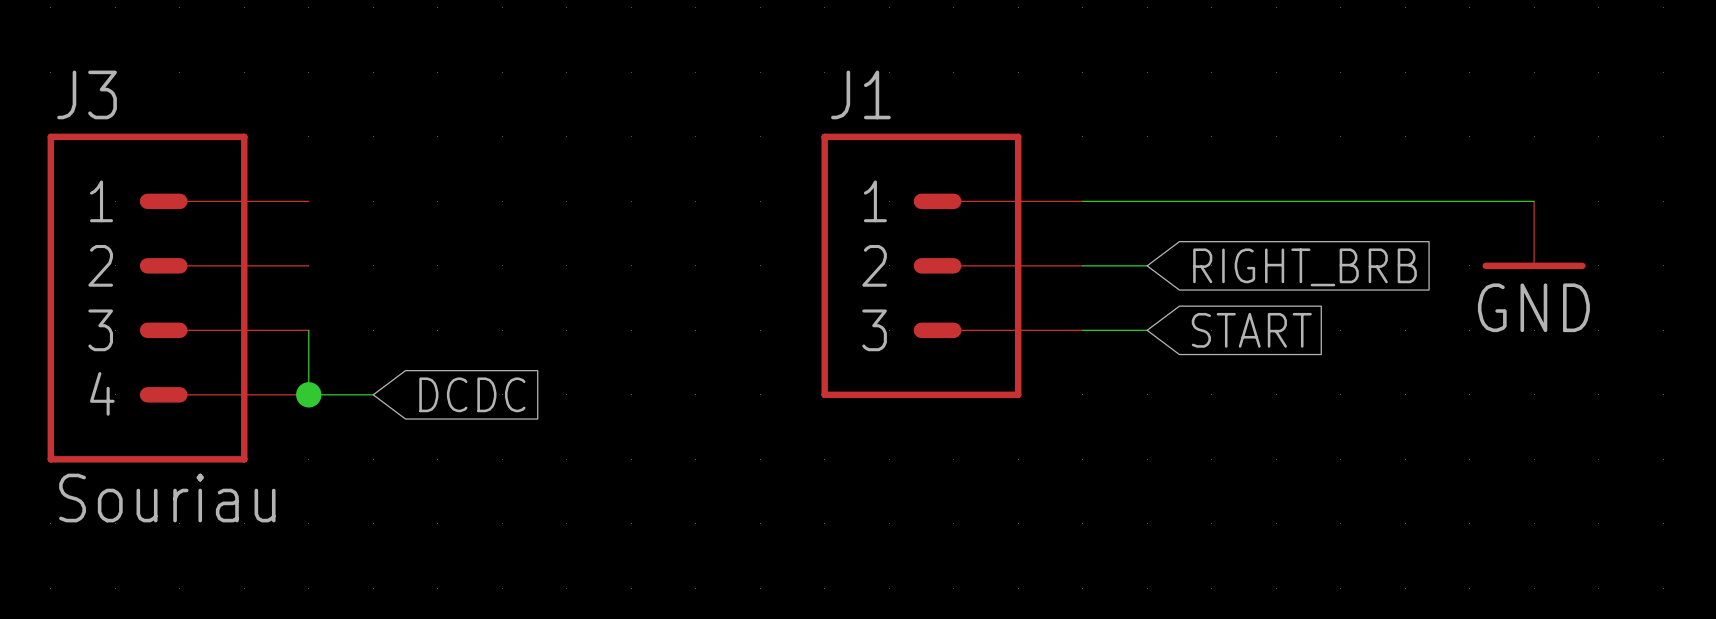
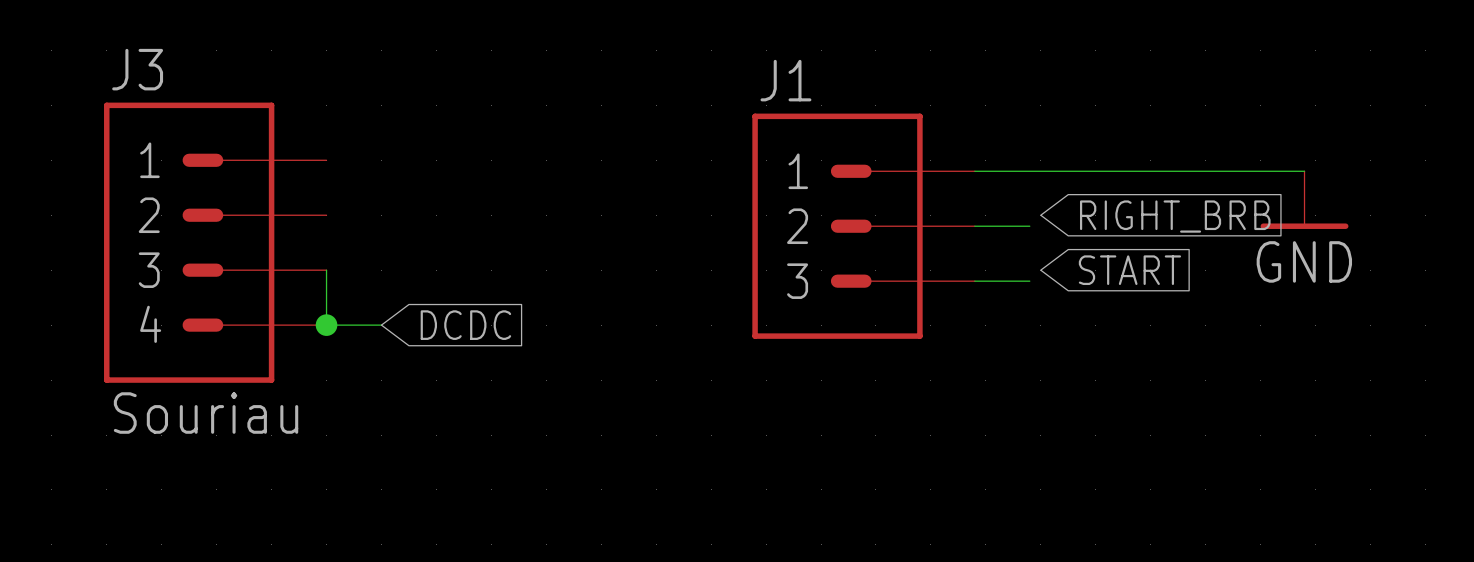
wire: (1082, 201) (1534, 201) -> none
wire: none -> (974, 171) (1304, 171)
power symbol position: GND (1534, 235) -> GND (1304, 200)
J1 position: (952, 265) -> (863, 226)
wire: (1082, 265) (1147, 265) -> (974, 226) (1029, 226)
wire: (1082, 330) (1147, 330) -> (974, 281) (1029, 281)

